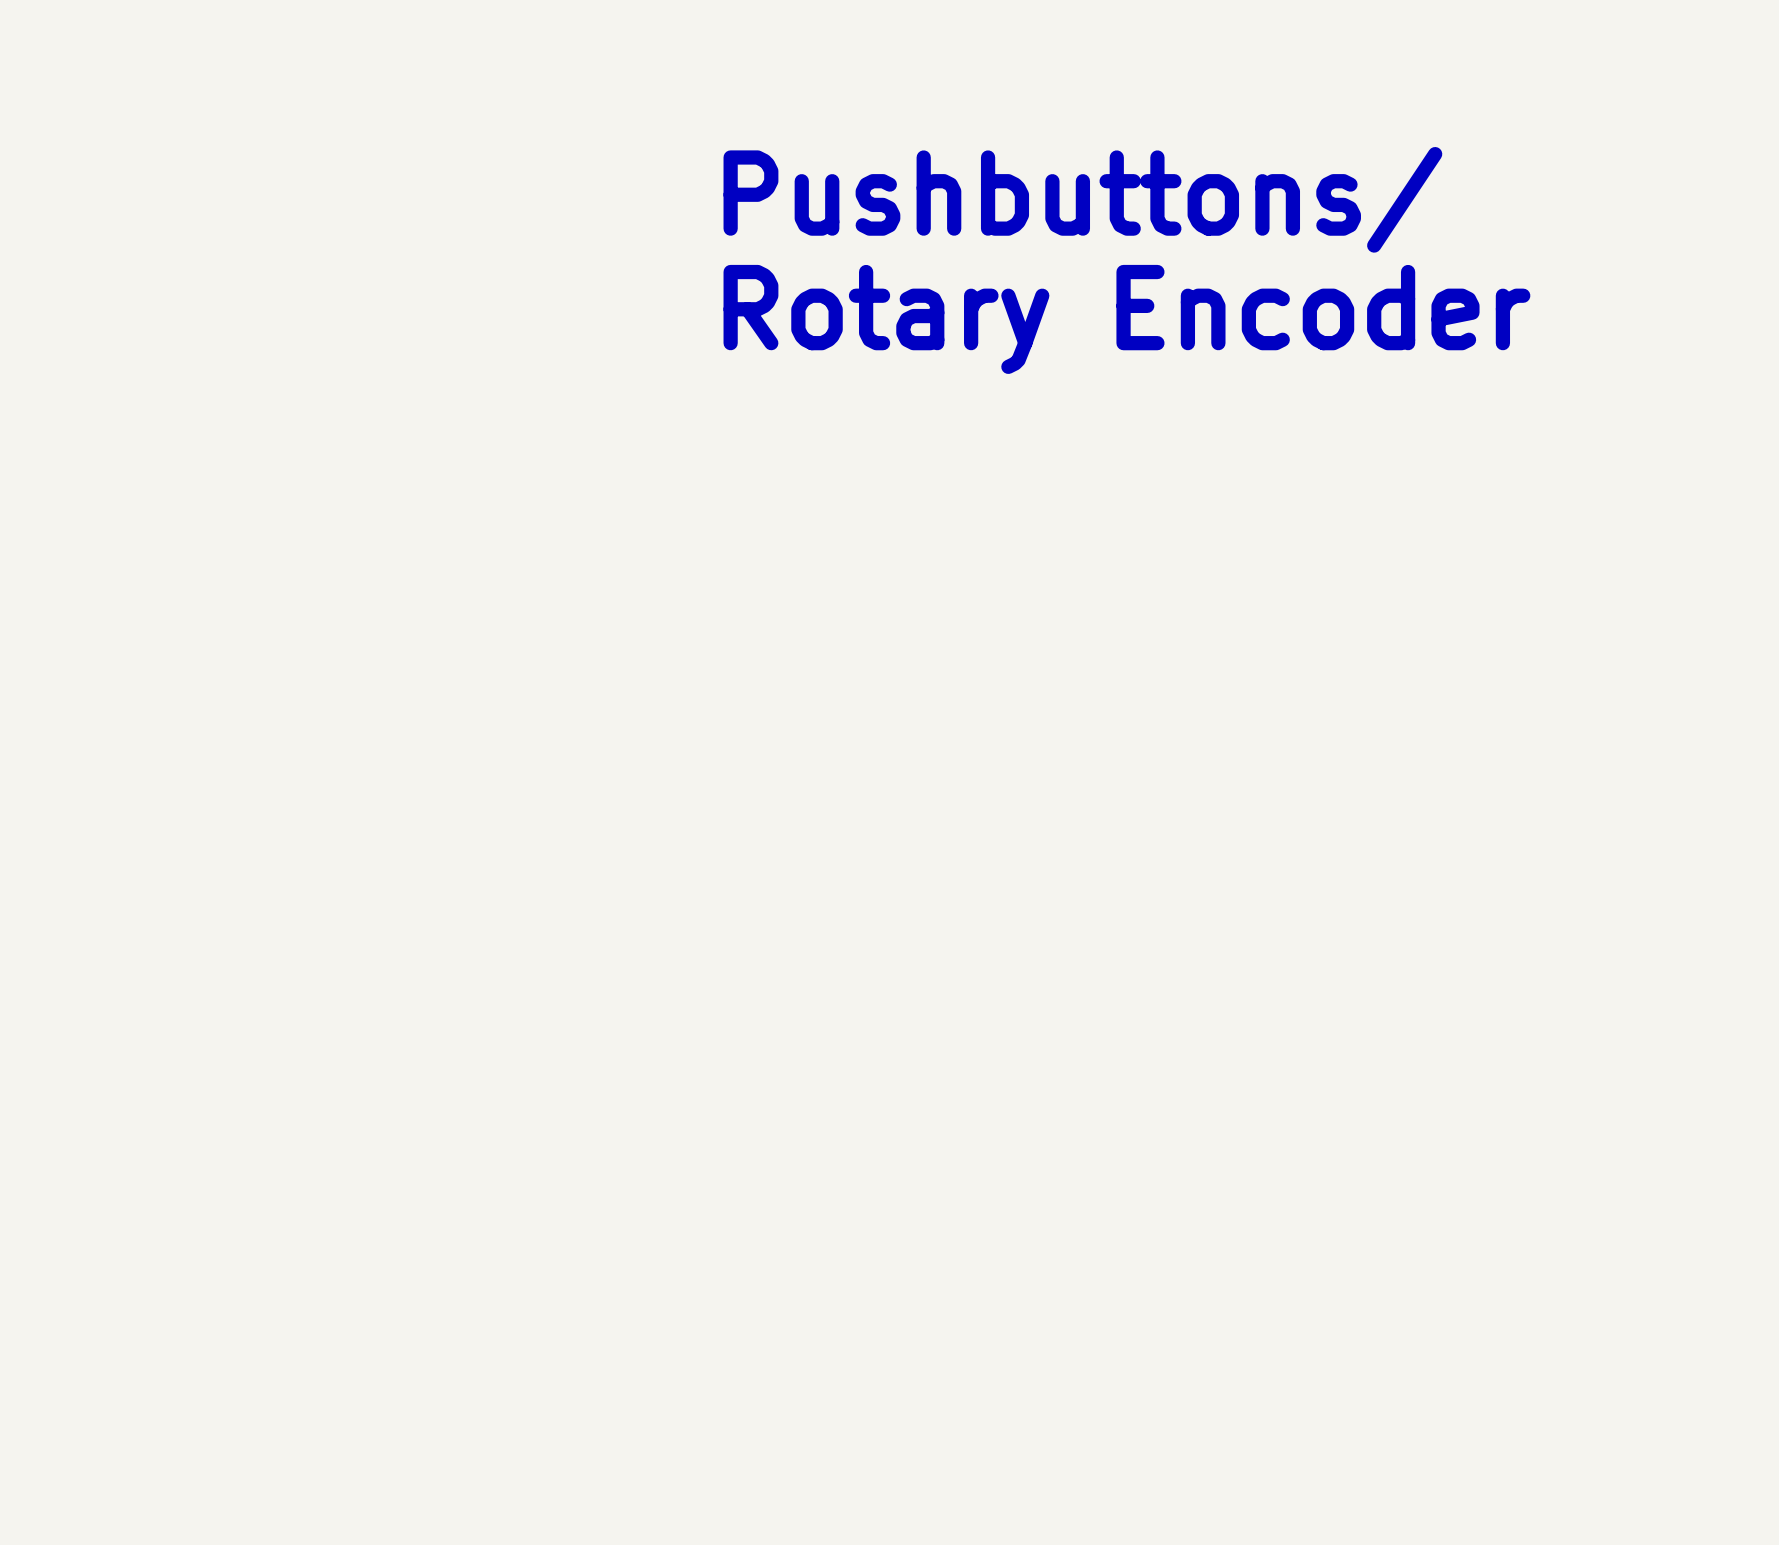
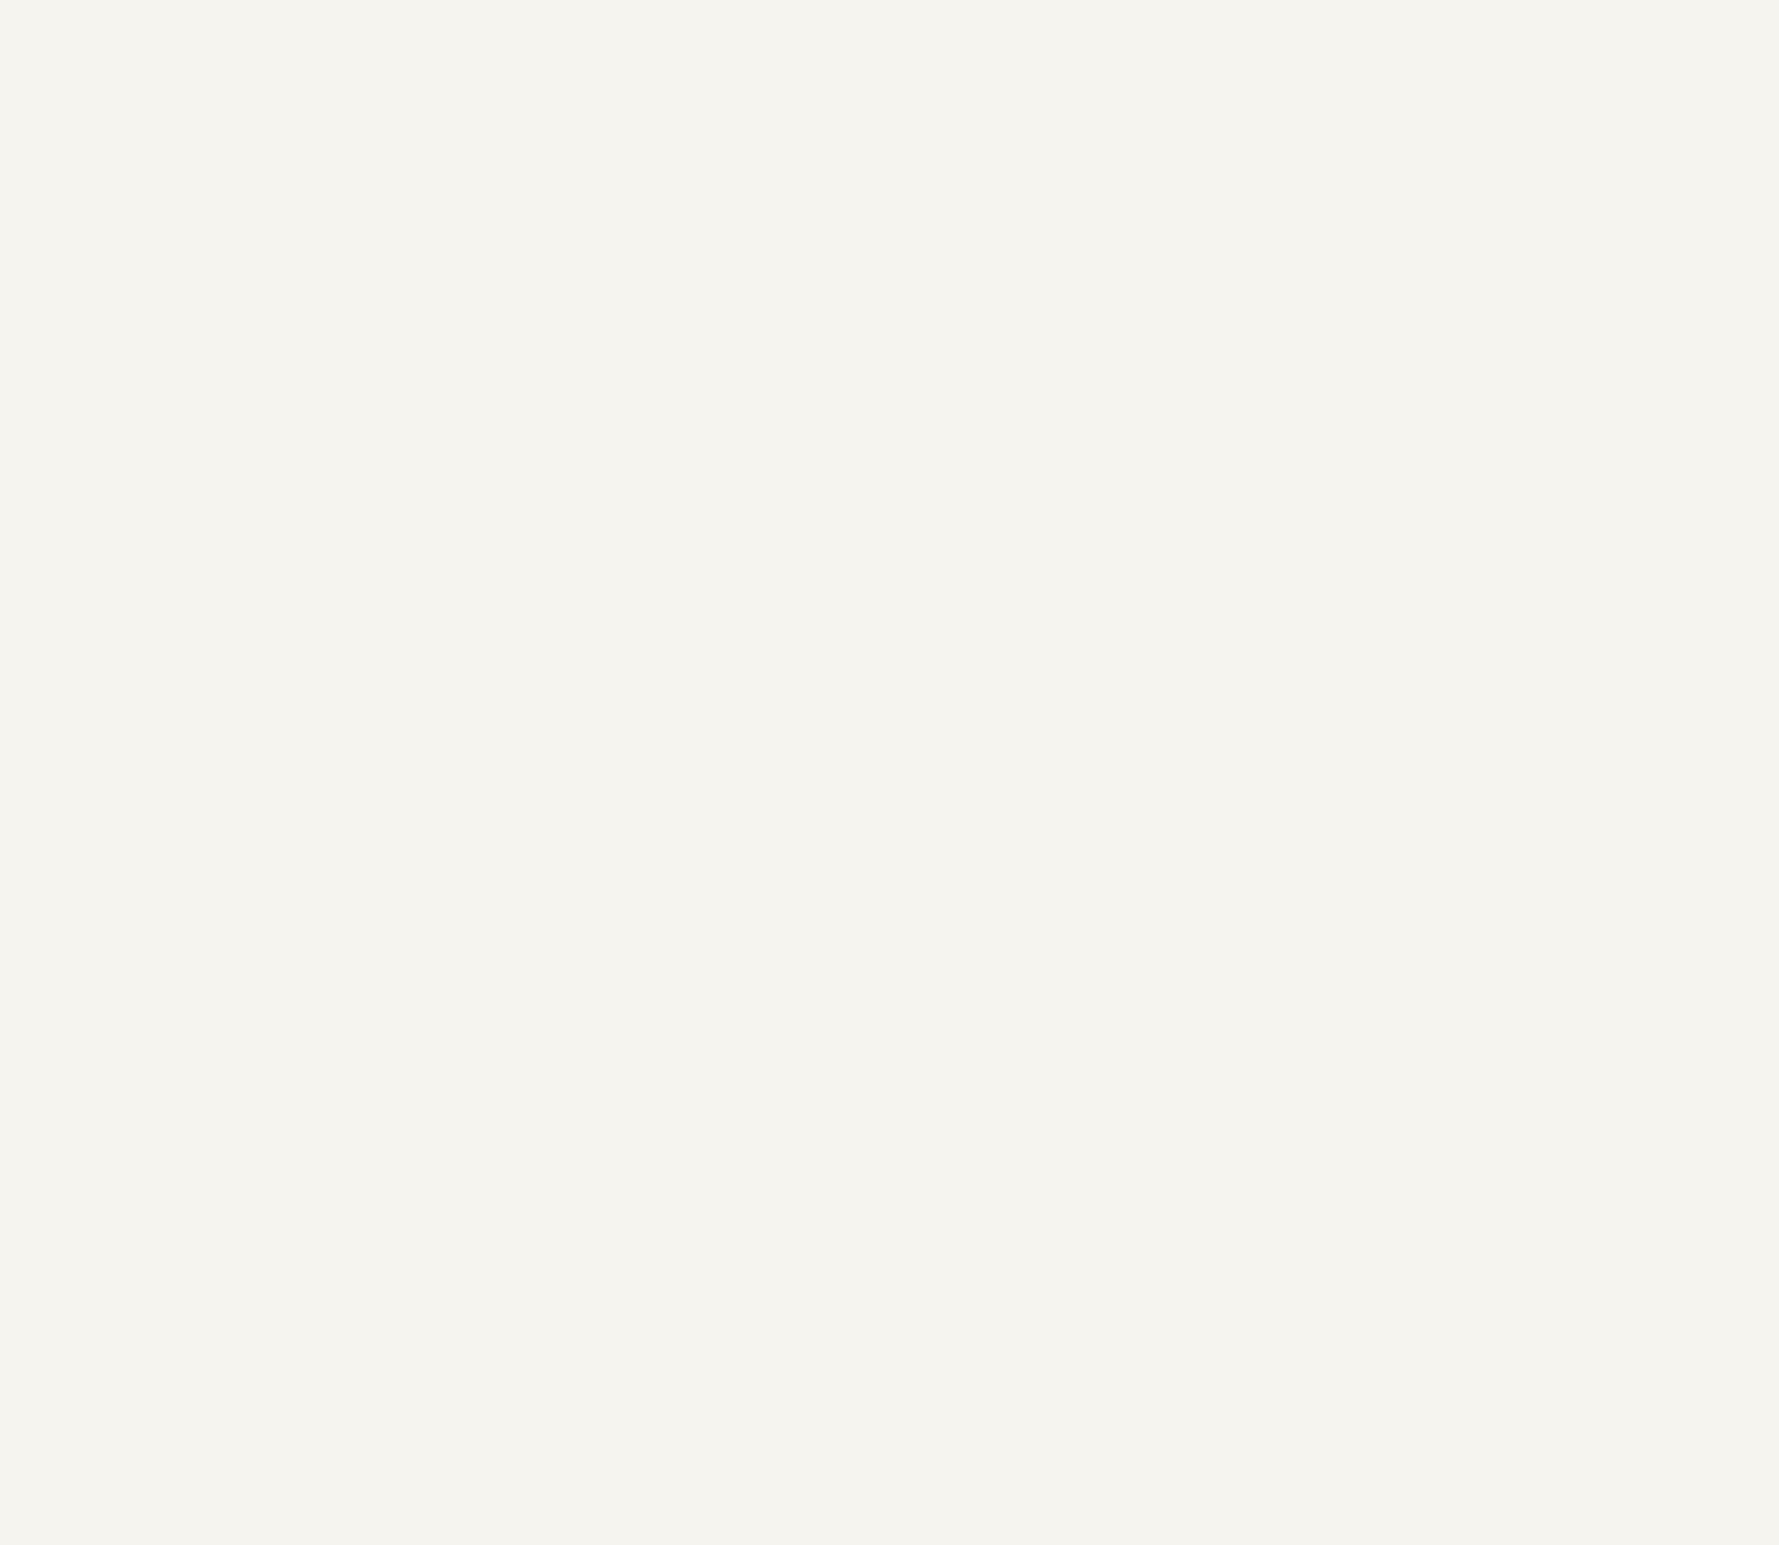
text: Pushbuttons/ (1082, 199) -> none
text: Rotary Encoder (1126, 319) -> none

